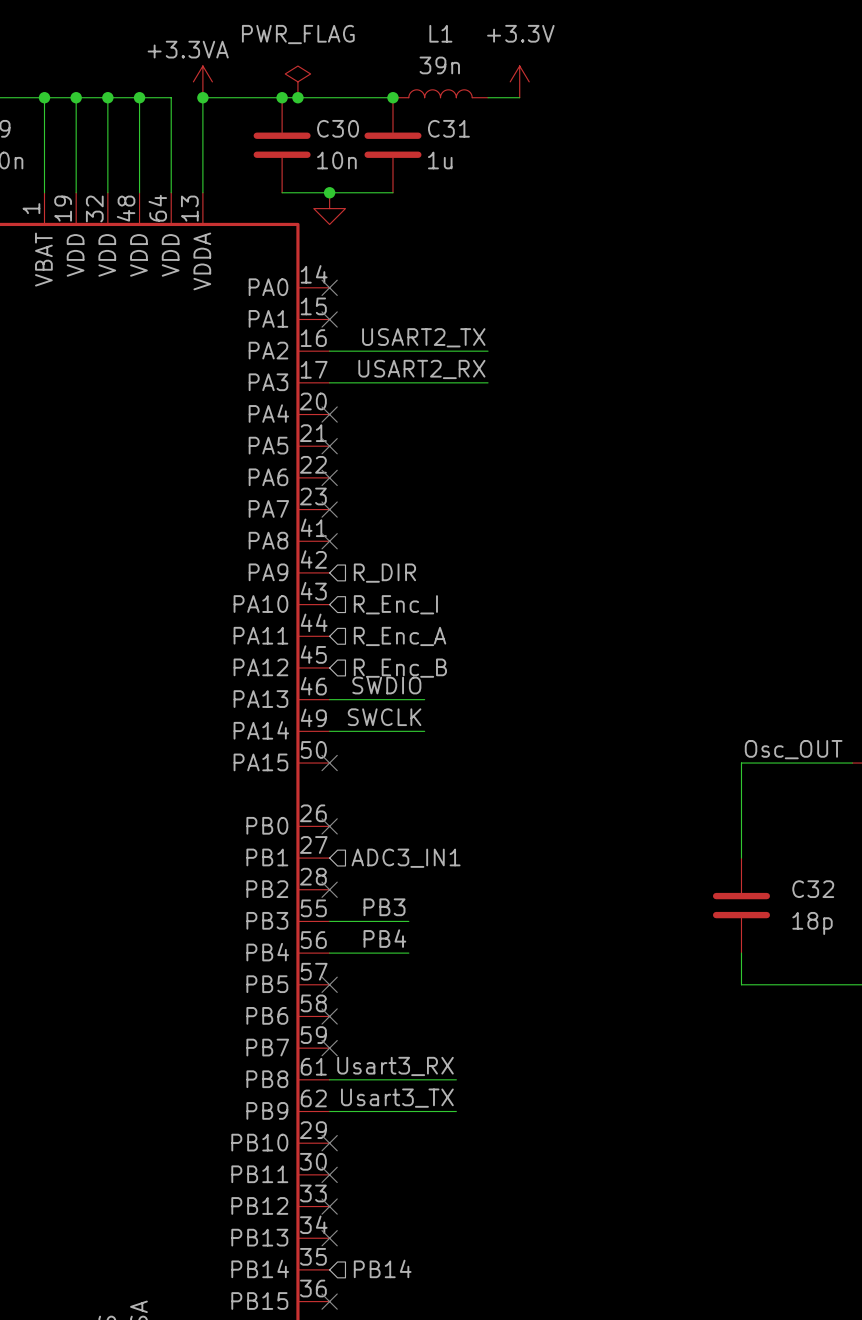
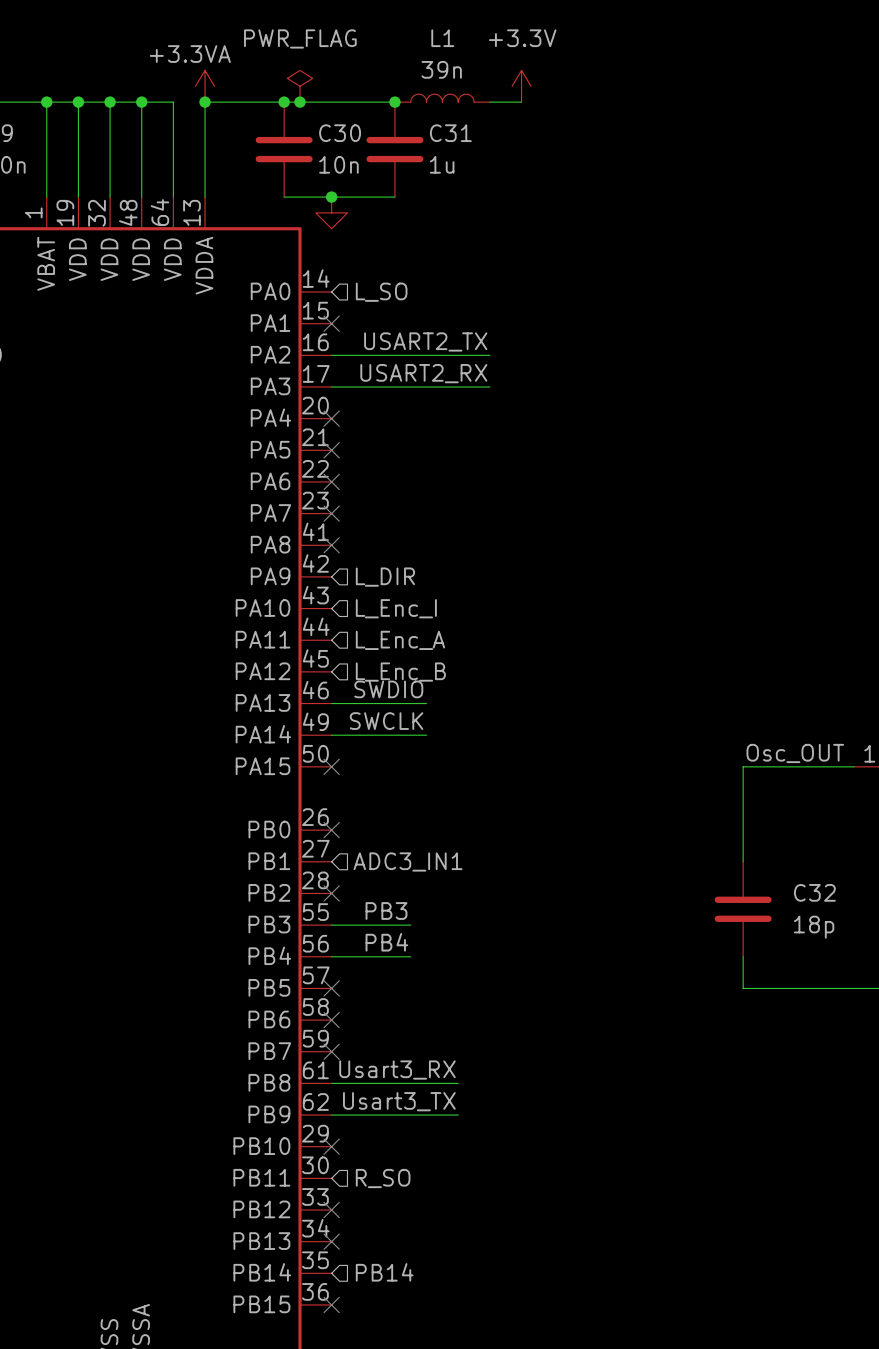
no-connect mark: (329, 287) -> none
hierarchical label: none -> L_SO (381, 292)
hierarchical label: R_DIR (384, 573) -> L_DIR (385, 577)
hierarchical label: R_Enc_I (395, 604) -> L_Enc_I (396, 608)
hierarchical label: R_Enc_A (400, 636) -> L_Enc_A (400, 640)
hierarchical label: R_Enc_B (400, 668) -> L_Enc_B (400, 672)
no-connect mark: (329, 1174) -> none
hierarchical label: none -> R_SO (383, 1178)

